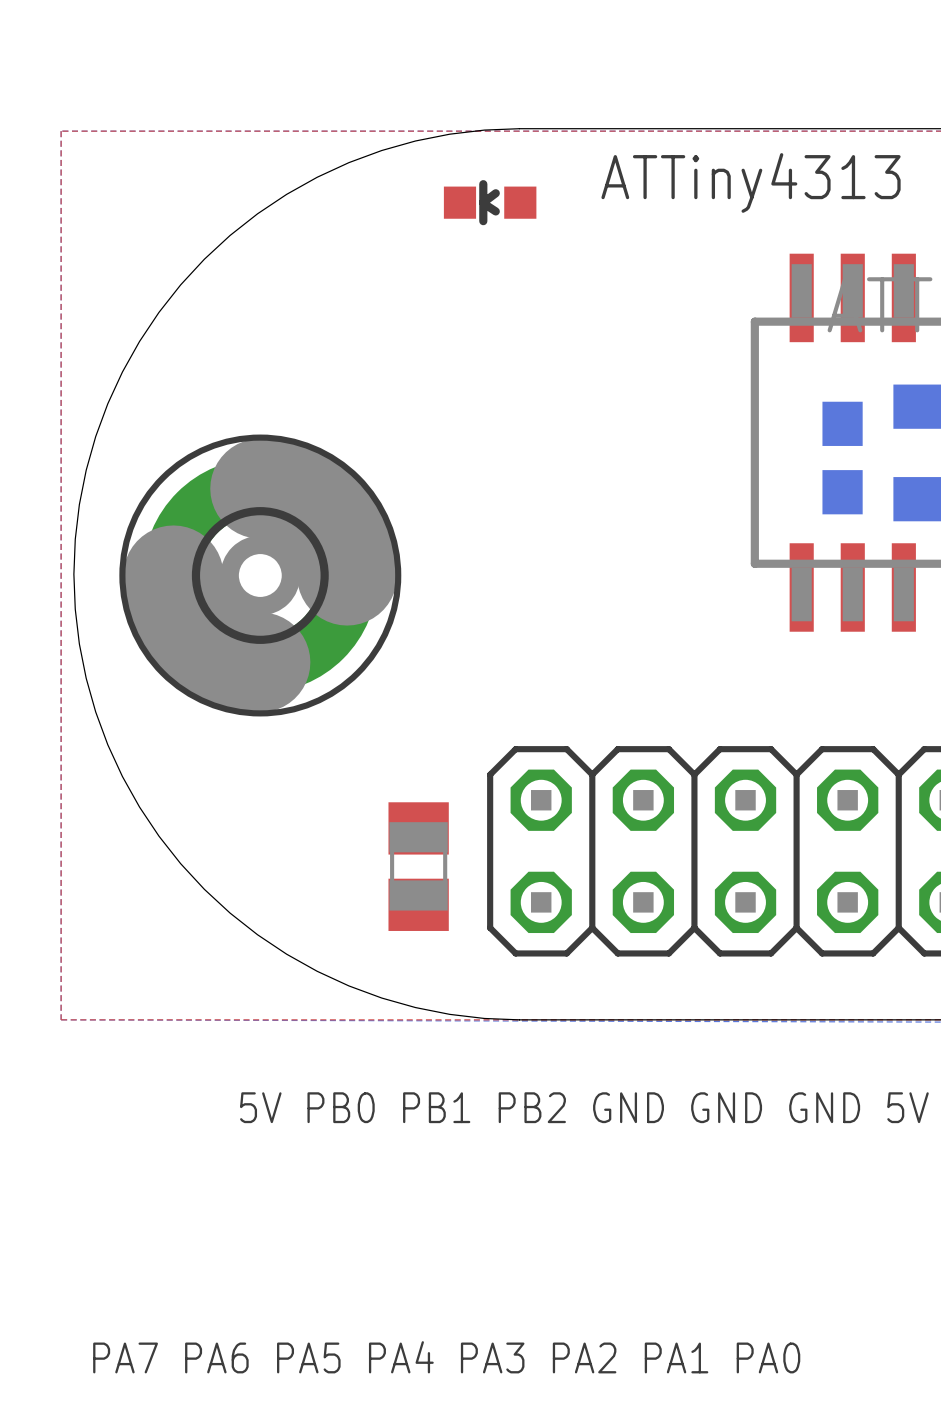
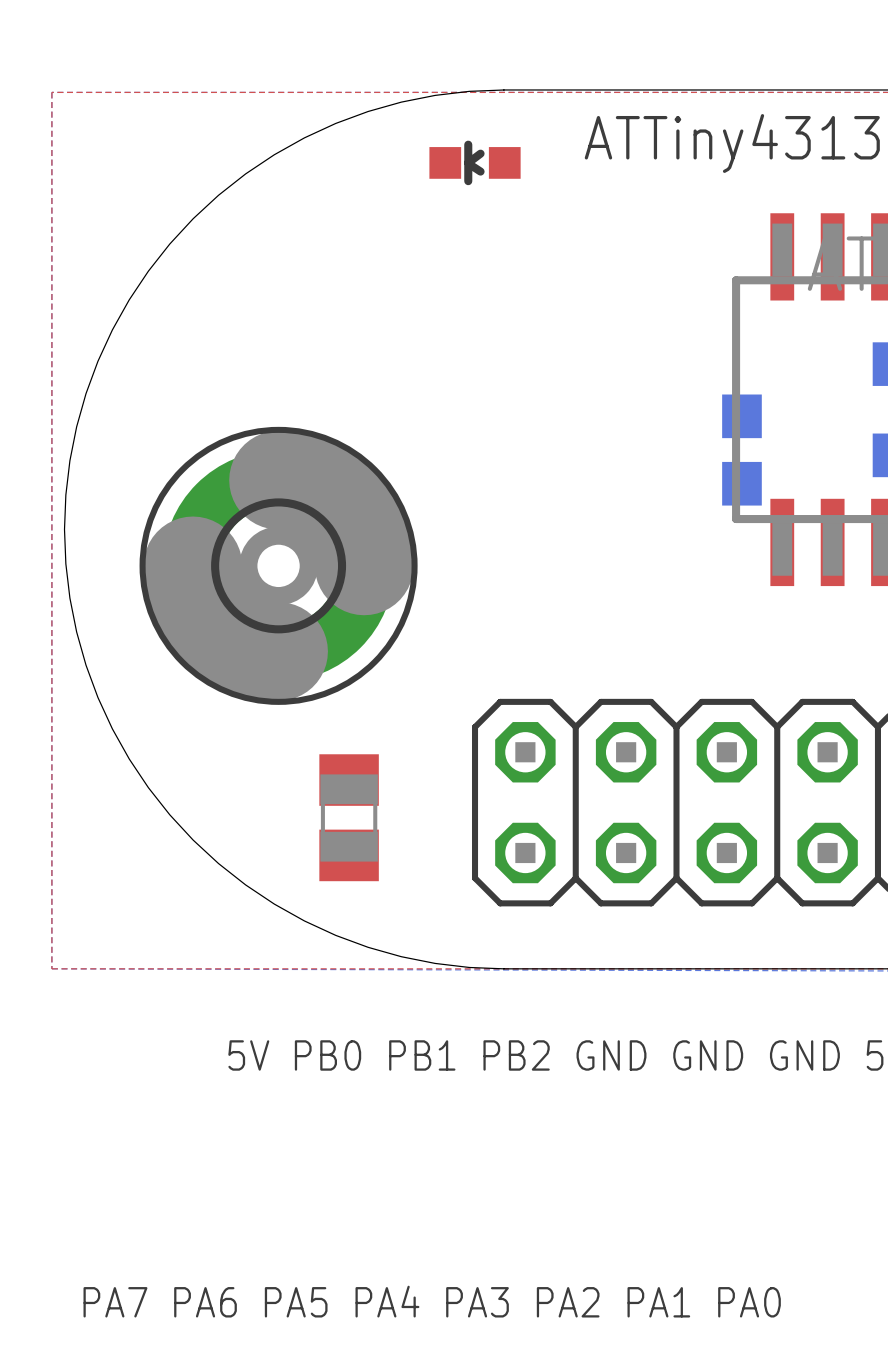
part position: (842, 458) -> (741, 450)
part position: (260, 575) -> (278, 565)
part position: (418, 866) -> (349, 817)

